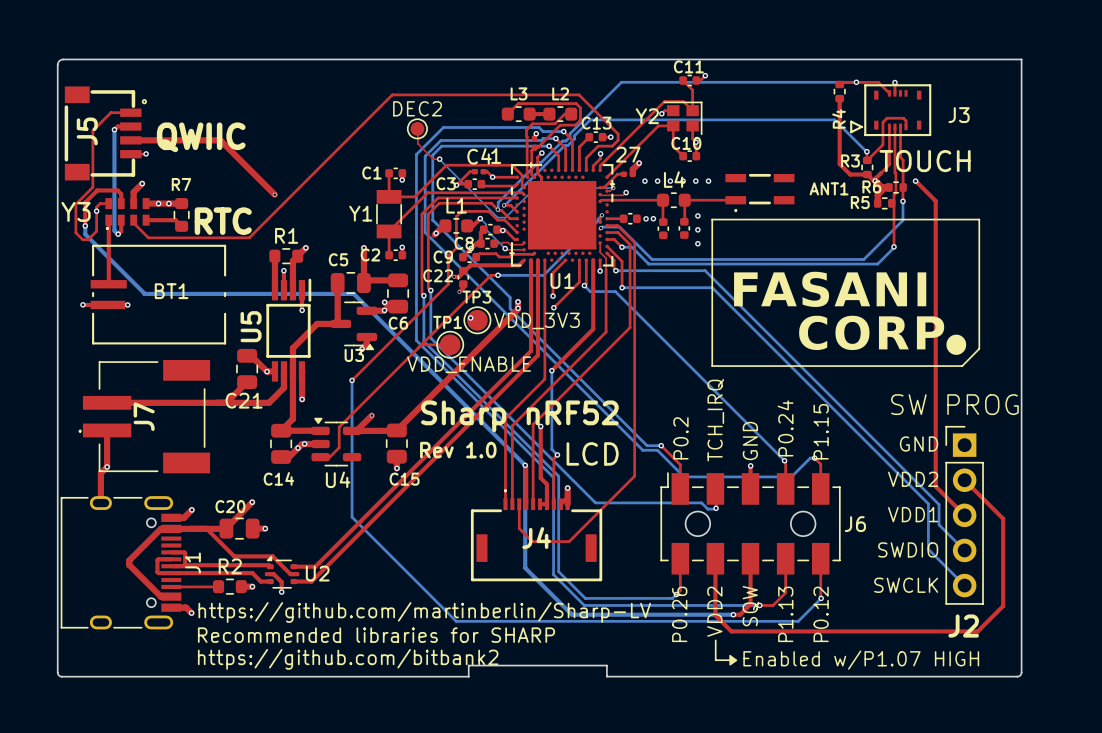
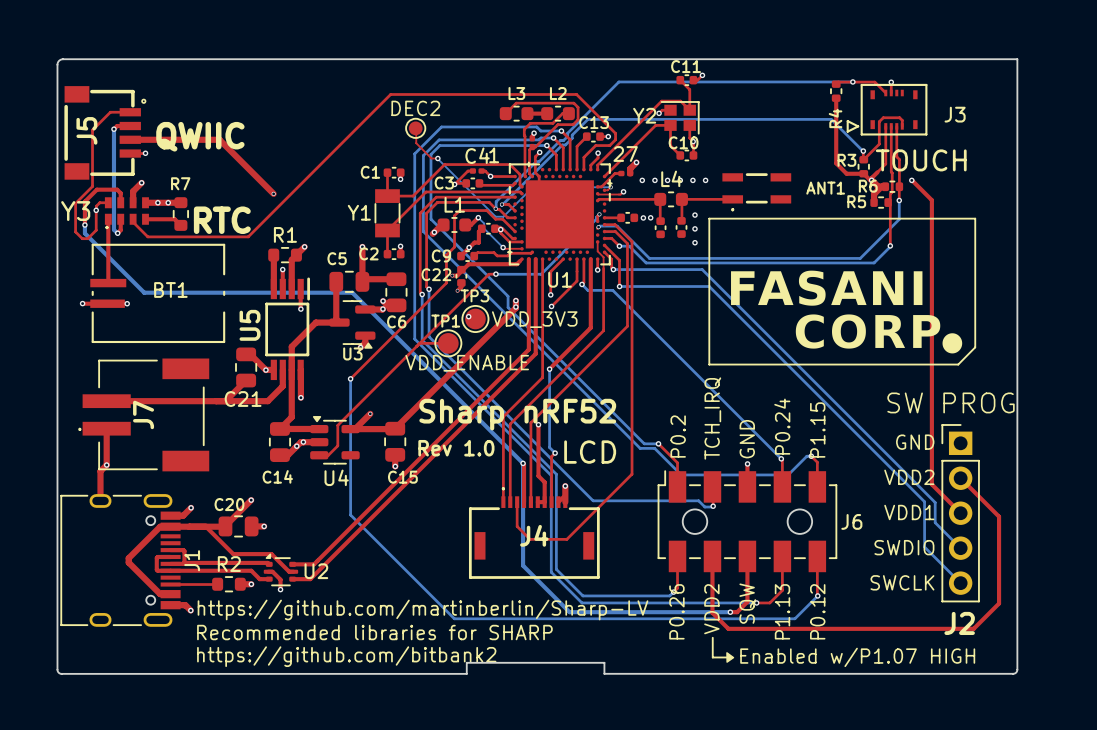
top track: (524, 242) (522, 244) (510, 244) (508, 242) (494, 243) -> (521, 241) (509, 241) (500, 233) (499, 228)
C8: (487, 243) -> none

